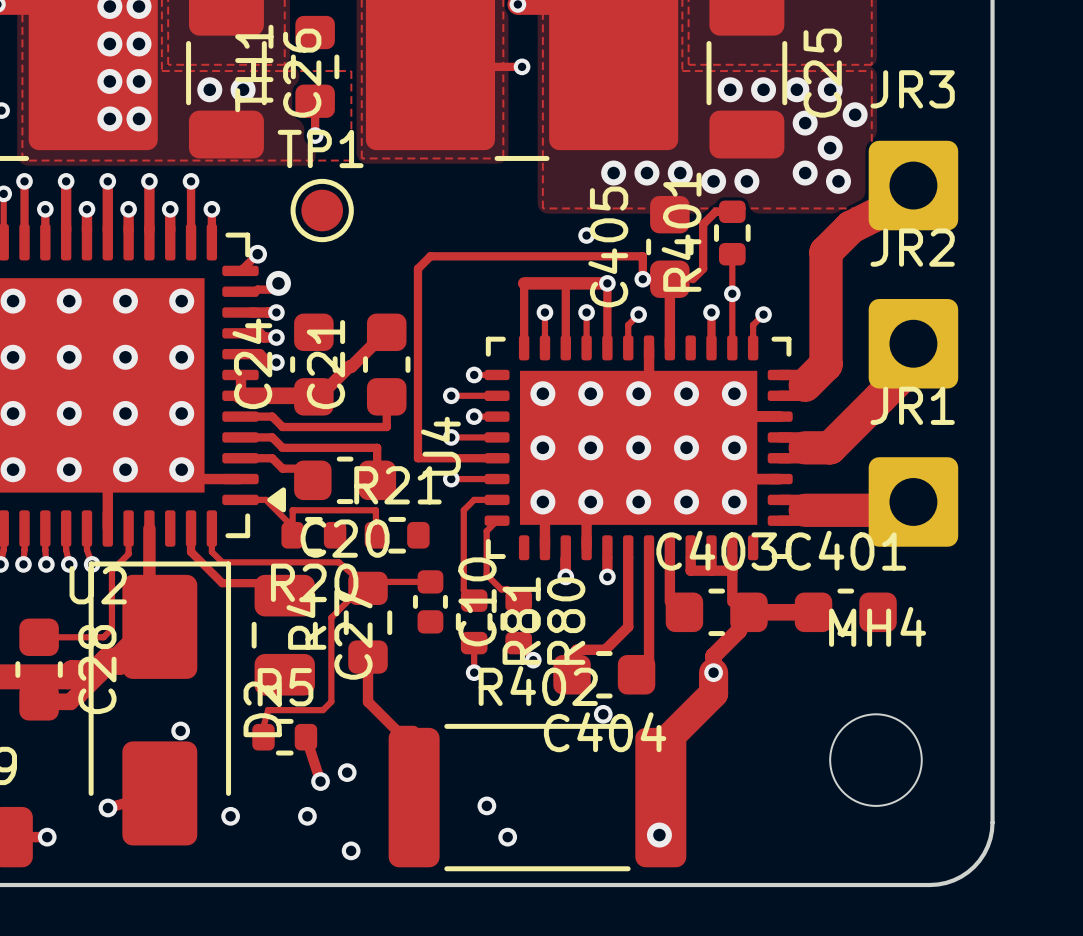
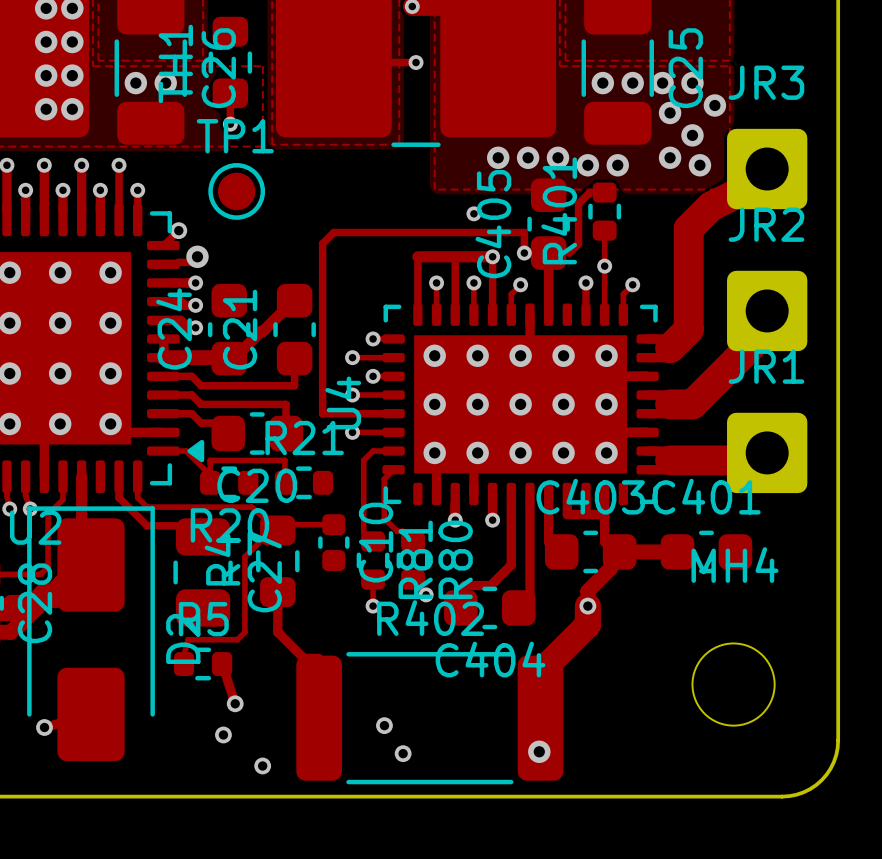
via: (603, 714) -> none
via: (180, 730) -> none
via: (347, 772) -> none
via: (230, 816) -> none

